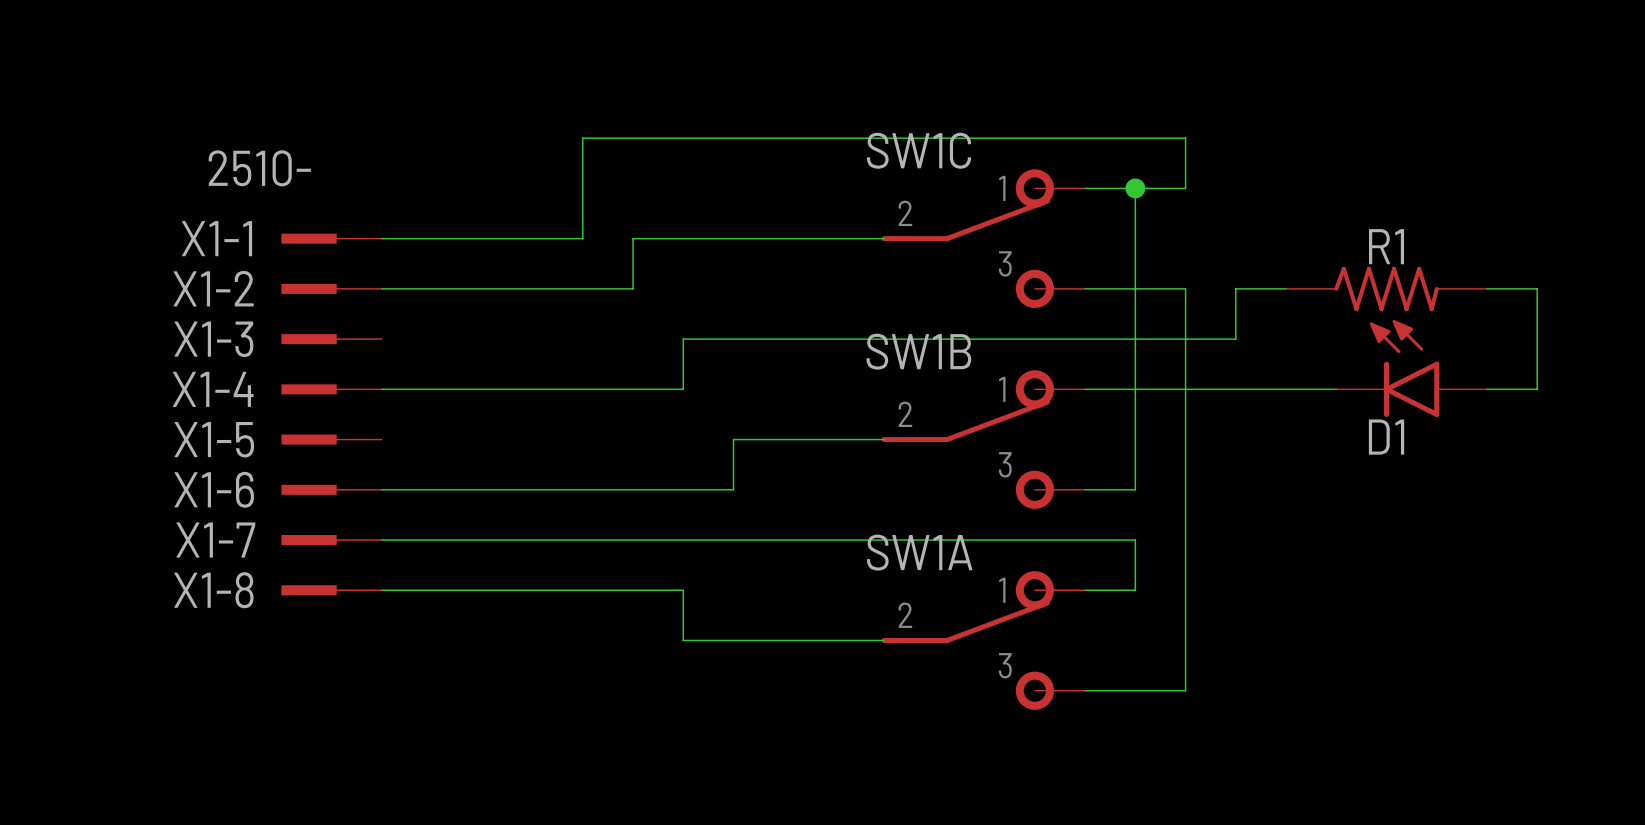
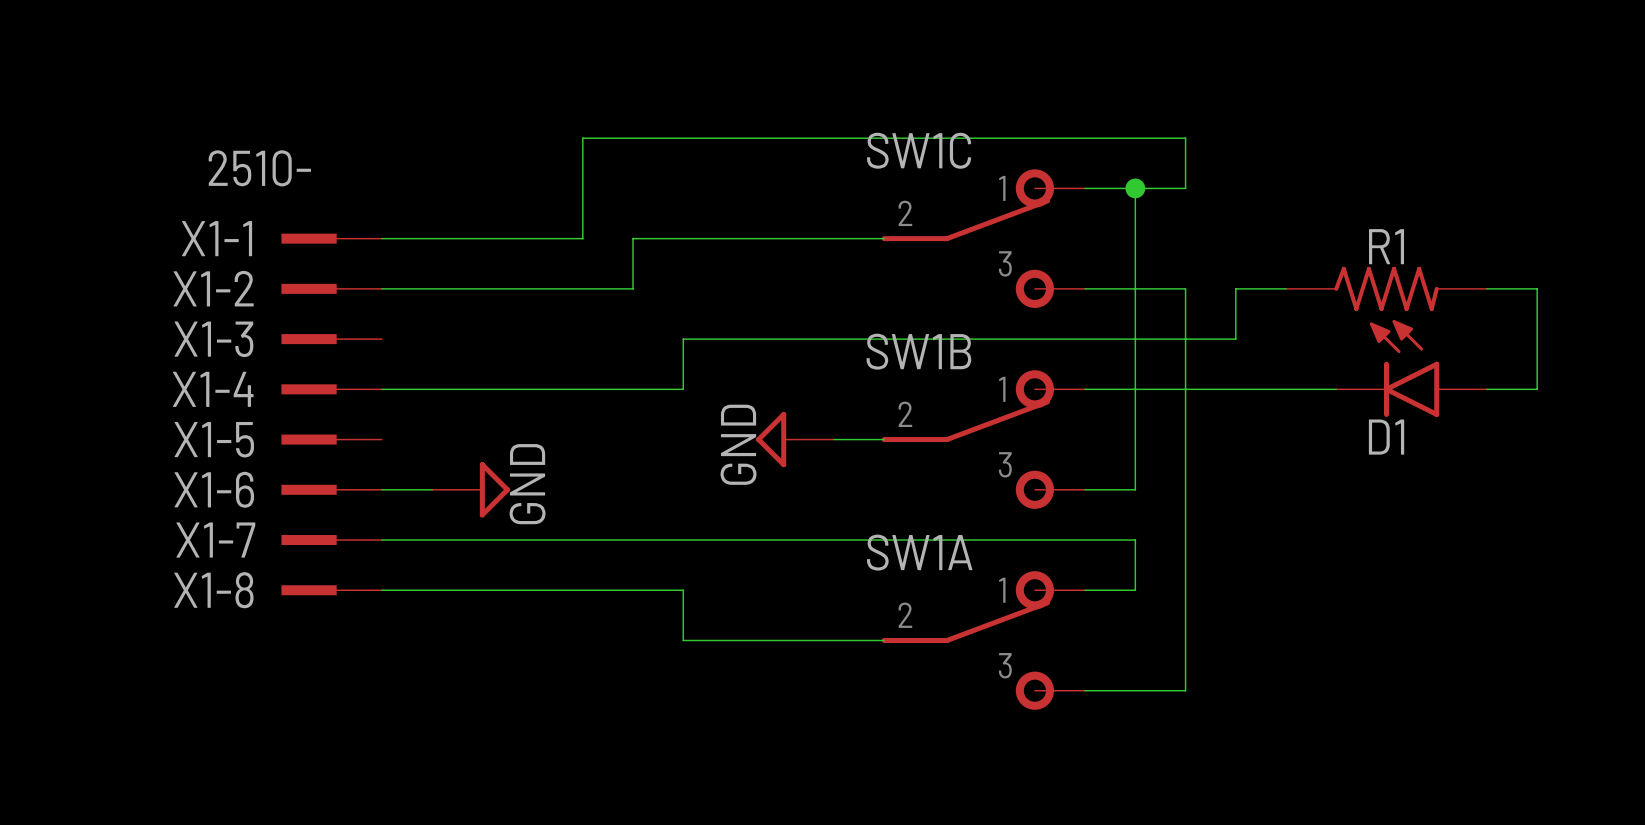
power symbol: none -> GND (795, 439)
wire: (833, 439) (733, 439) (733, 489) (432, 489) -> none
power symbol: none -> GND (471, 489)

